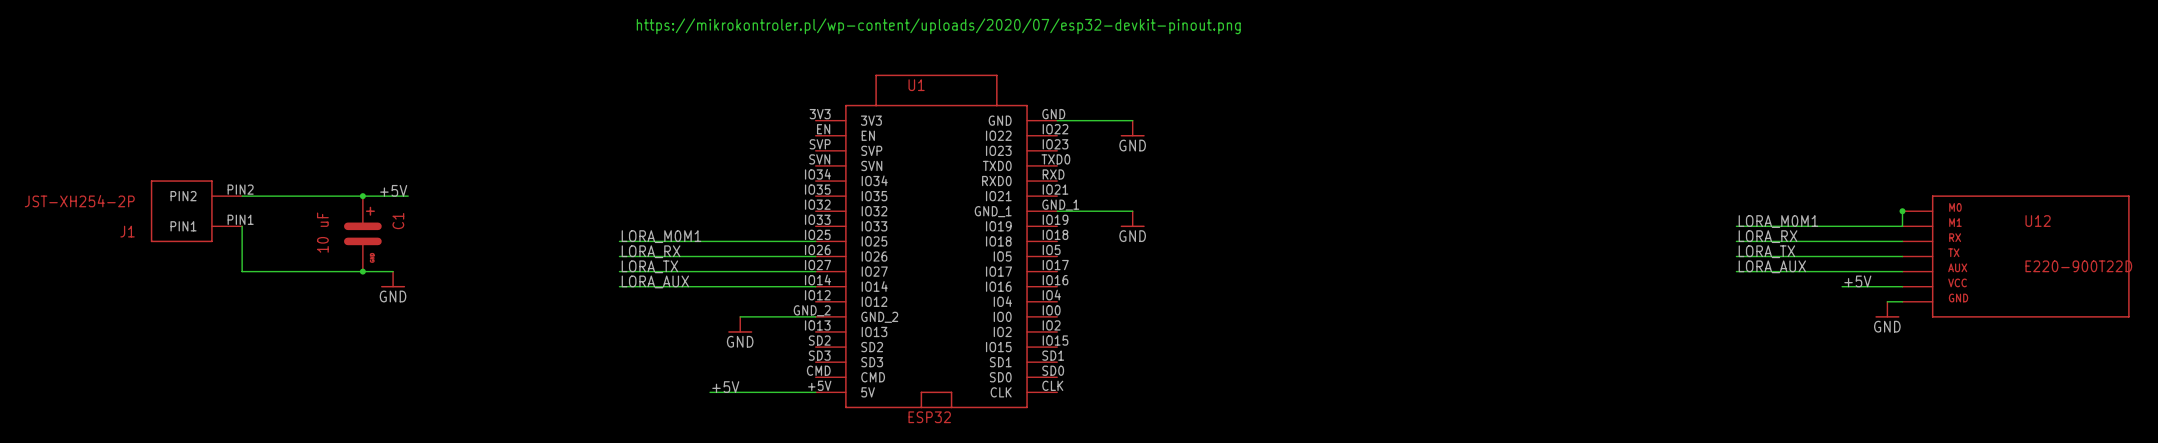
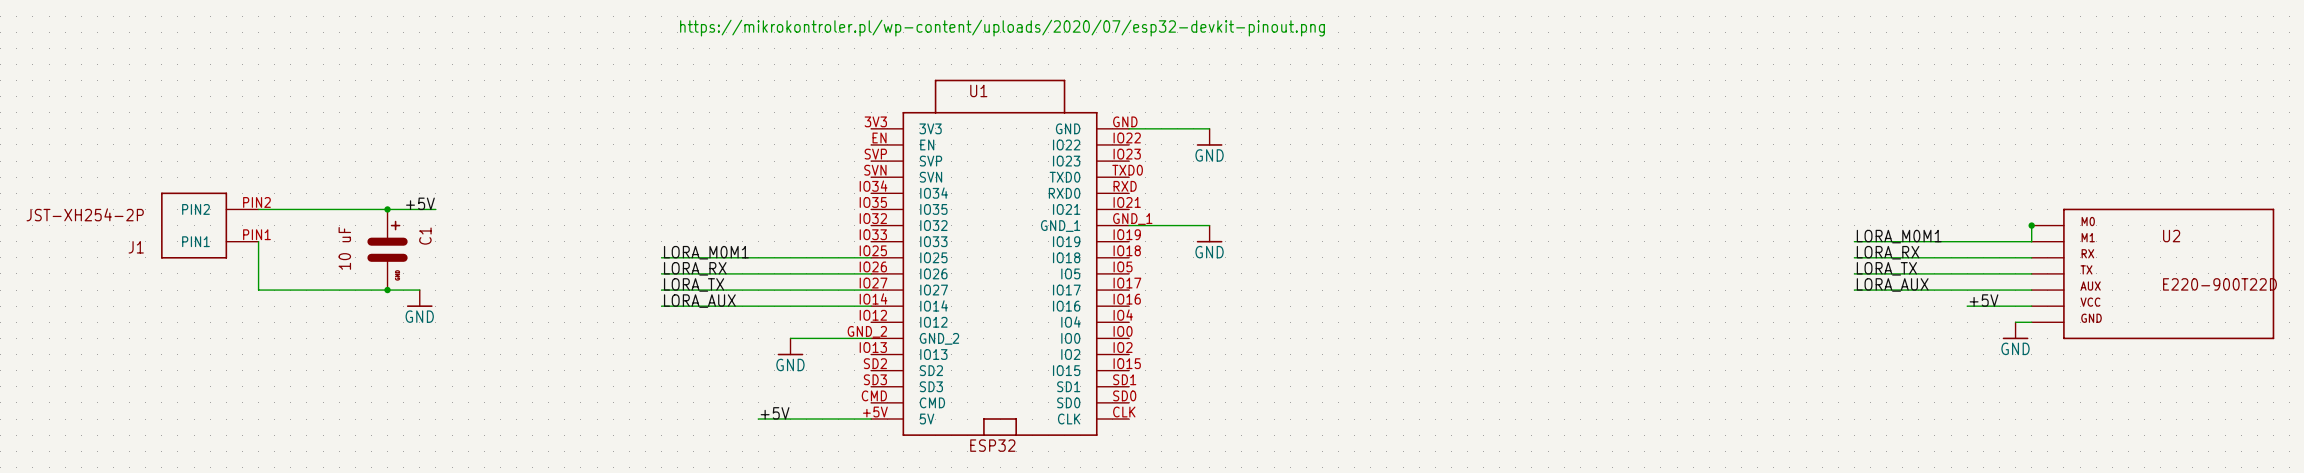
U12 name: U12 (2038, 221) -> U2 (2171, 236)

